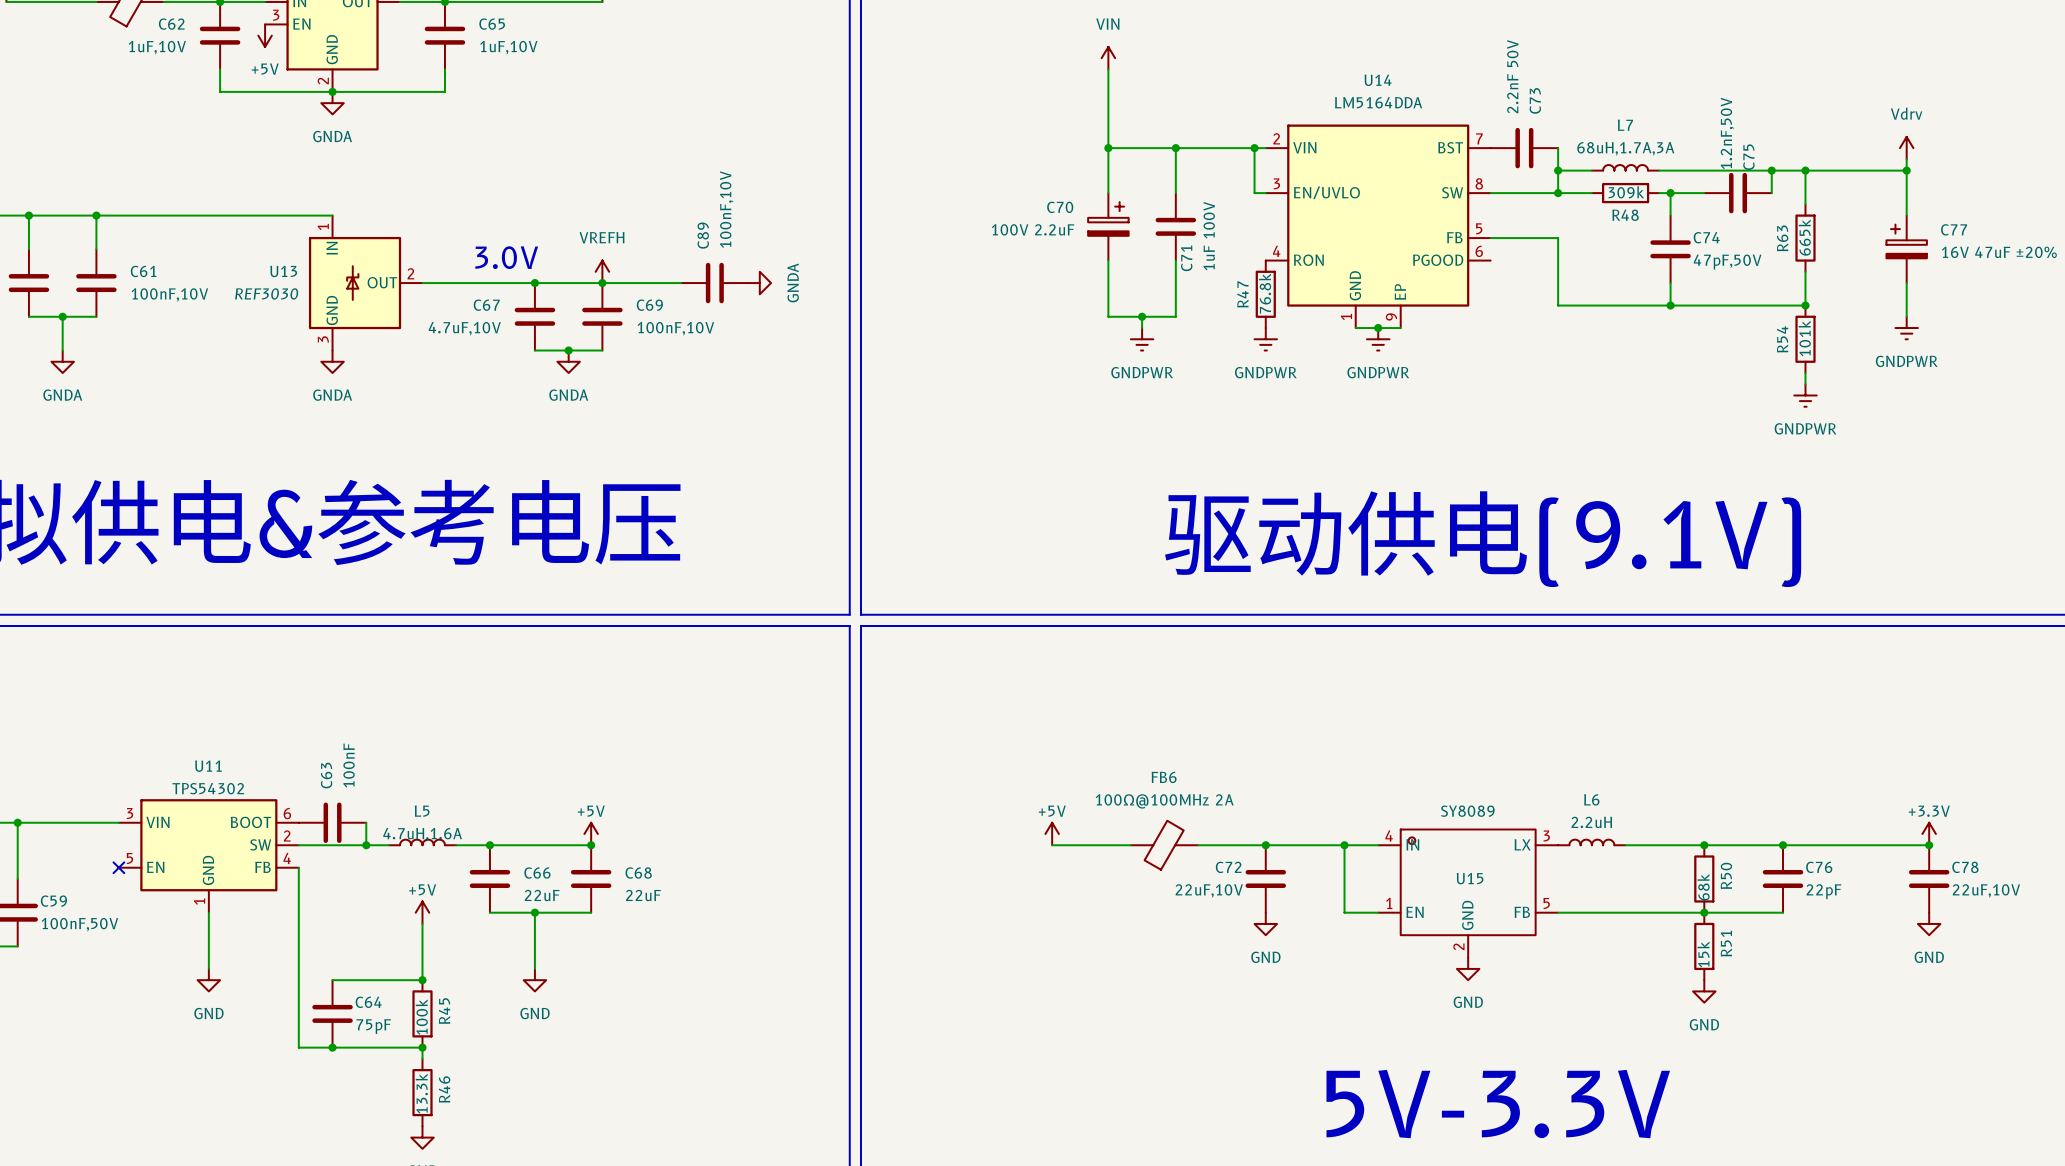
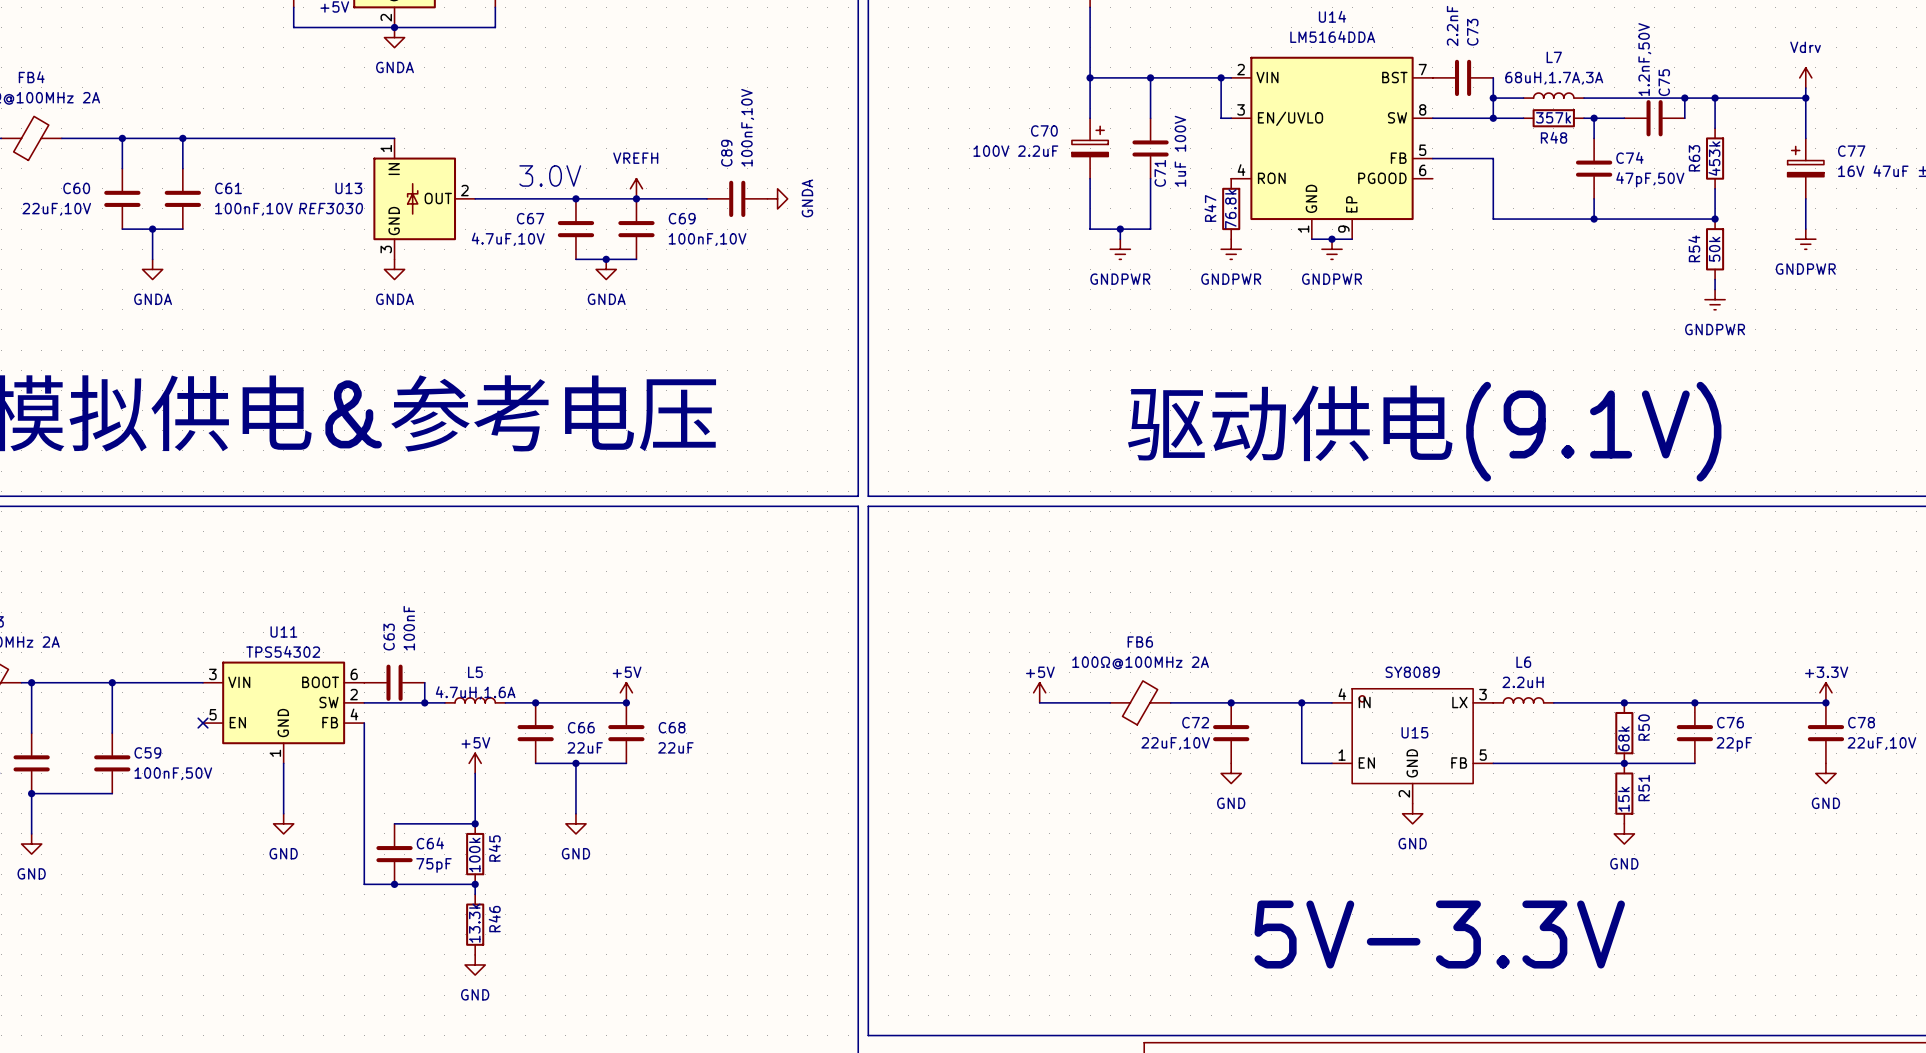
R48 value: 309k (1626, 192) -> 357k (1553, 117)
R63 value: 665k (1804, 237) -> 453k (1714, 158)
R54 value: 101k (1804, 338) -> 50k (1714, 249)

